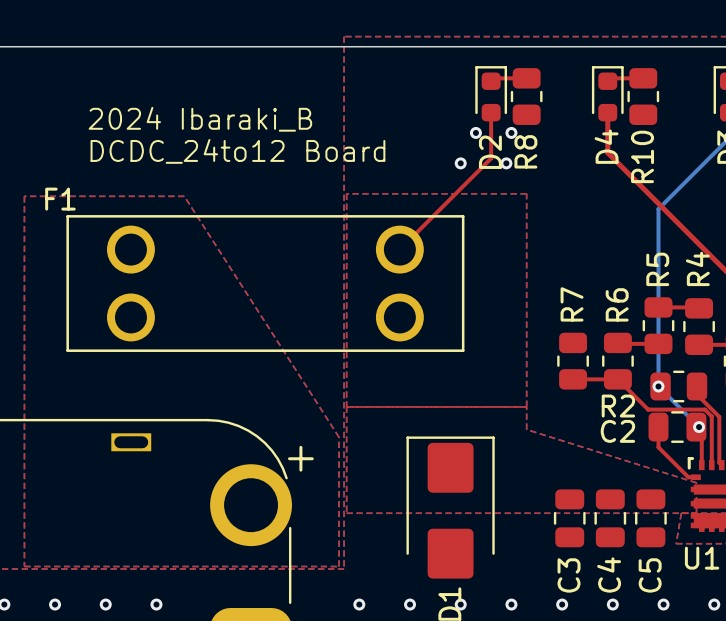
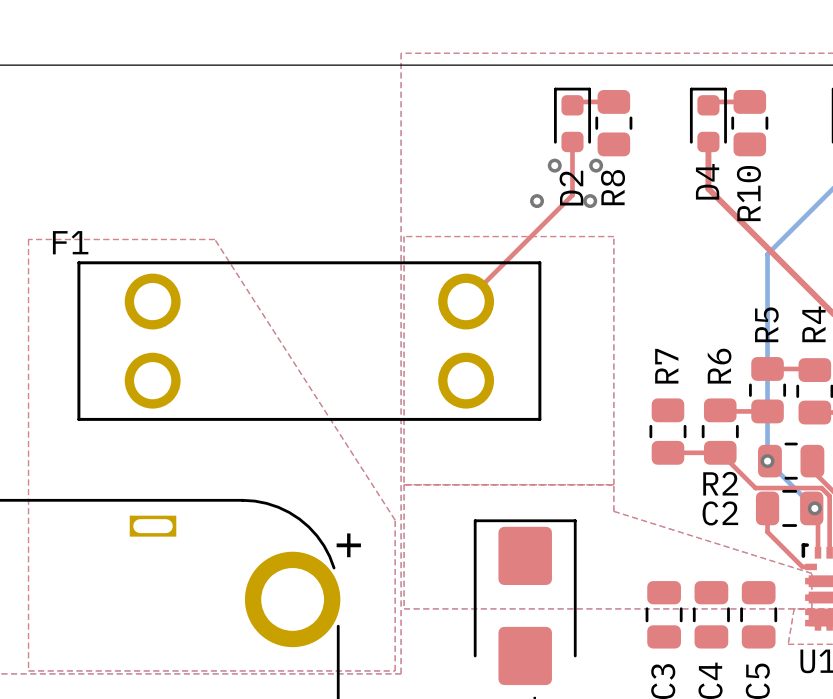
text: 2024 Ibaraki_B (200, 119) -> none
text: DCDC_24to12 Board (237, 151) -> none

